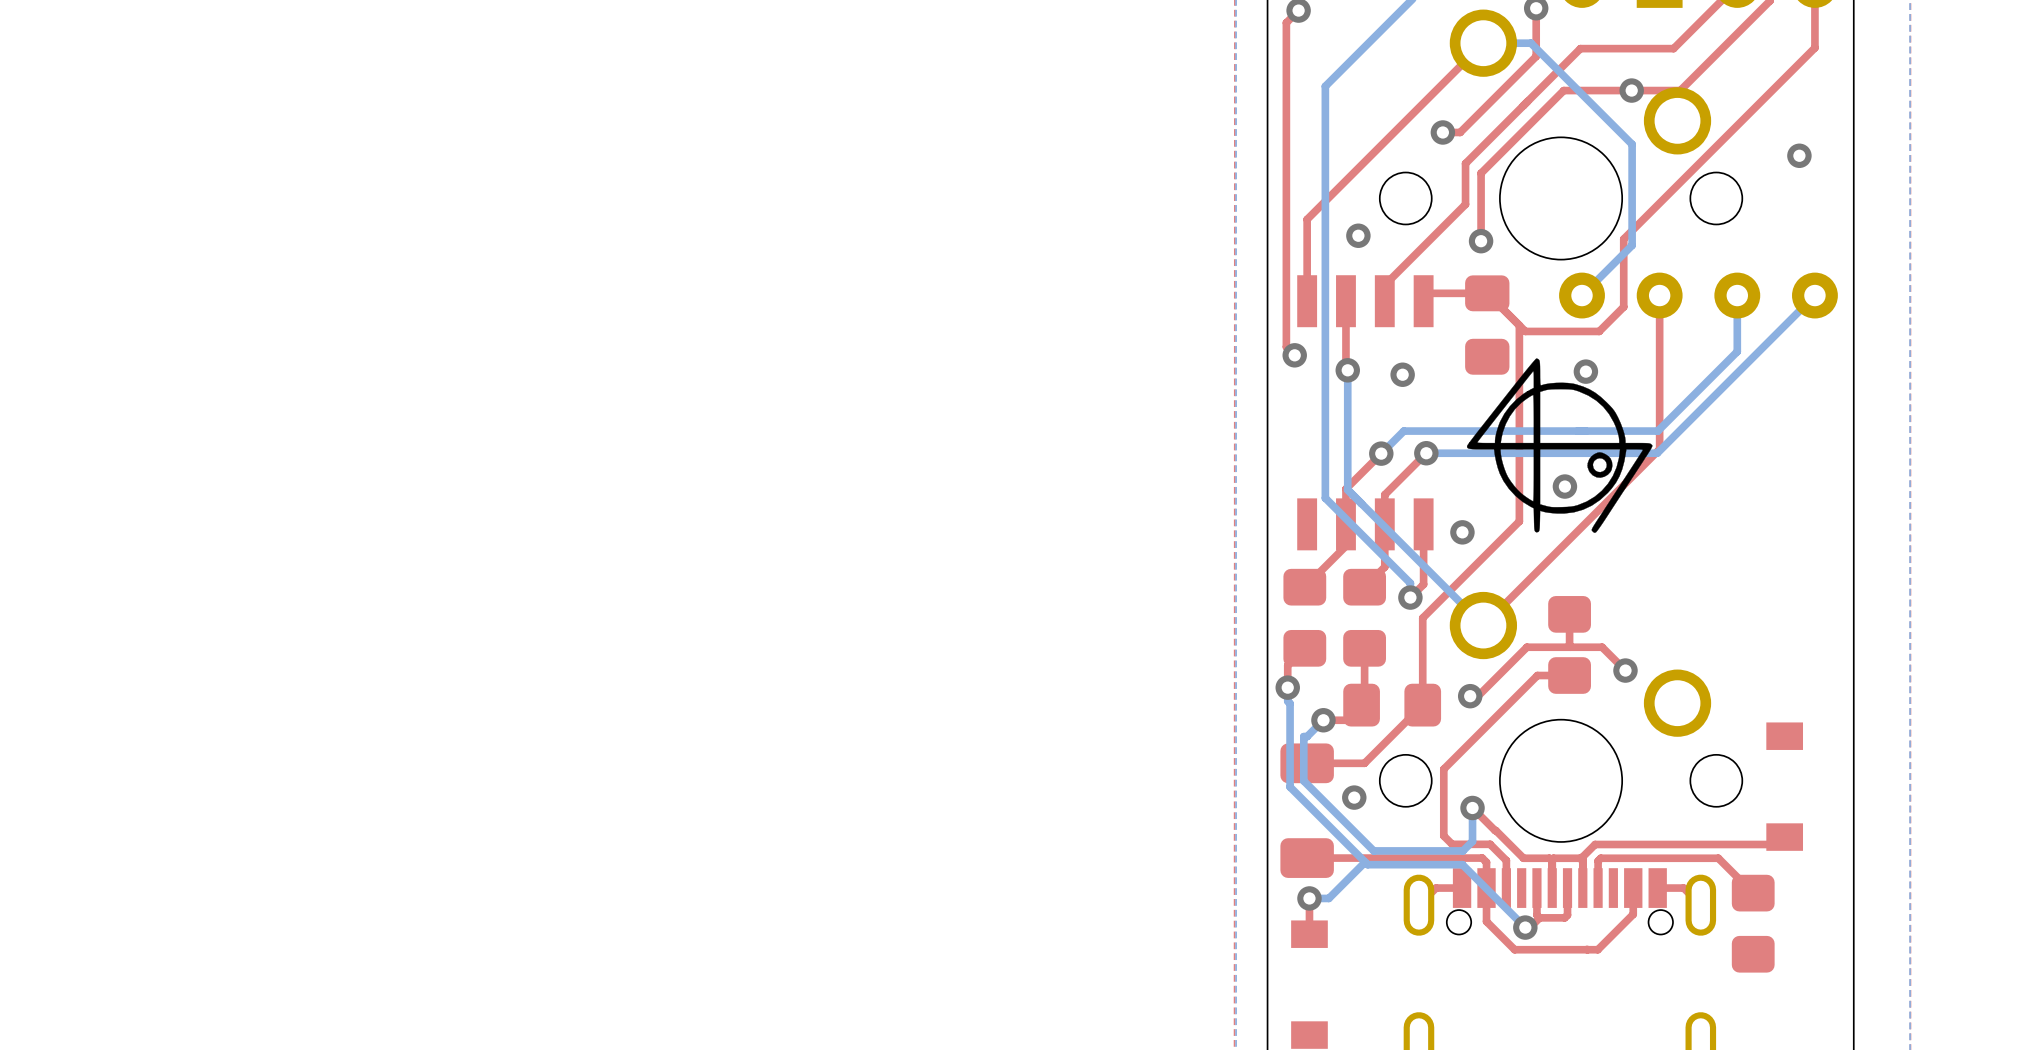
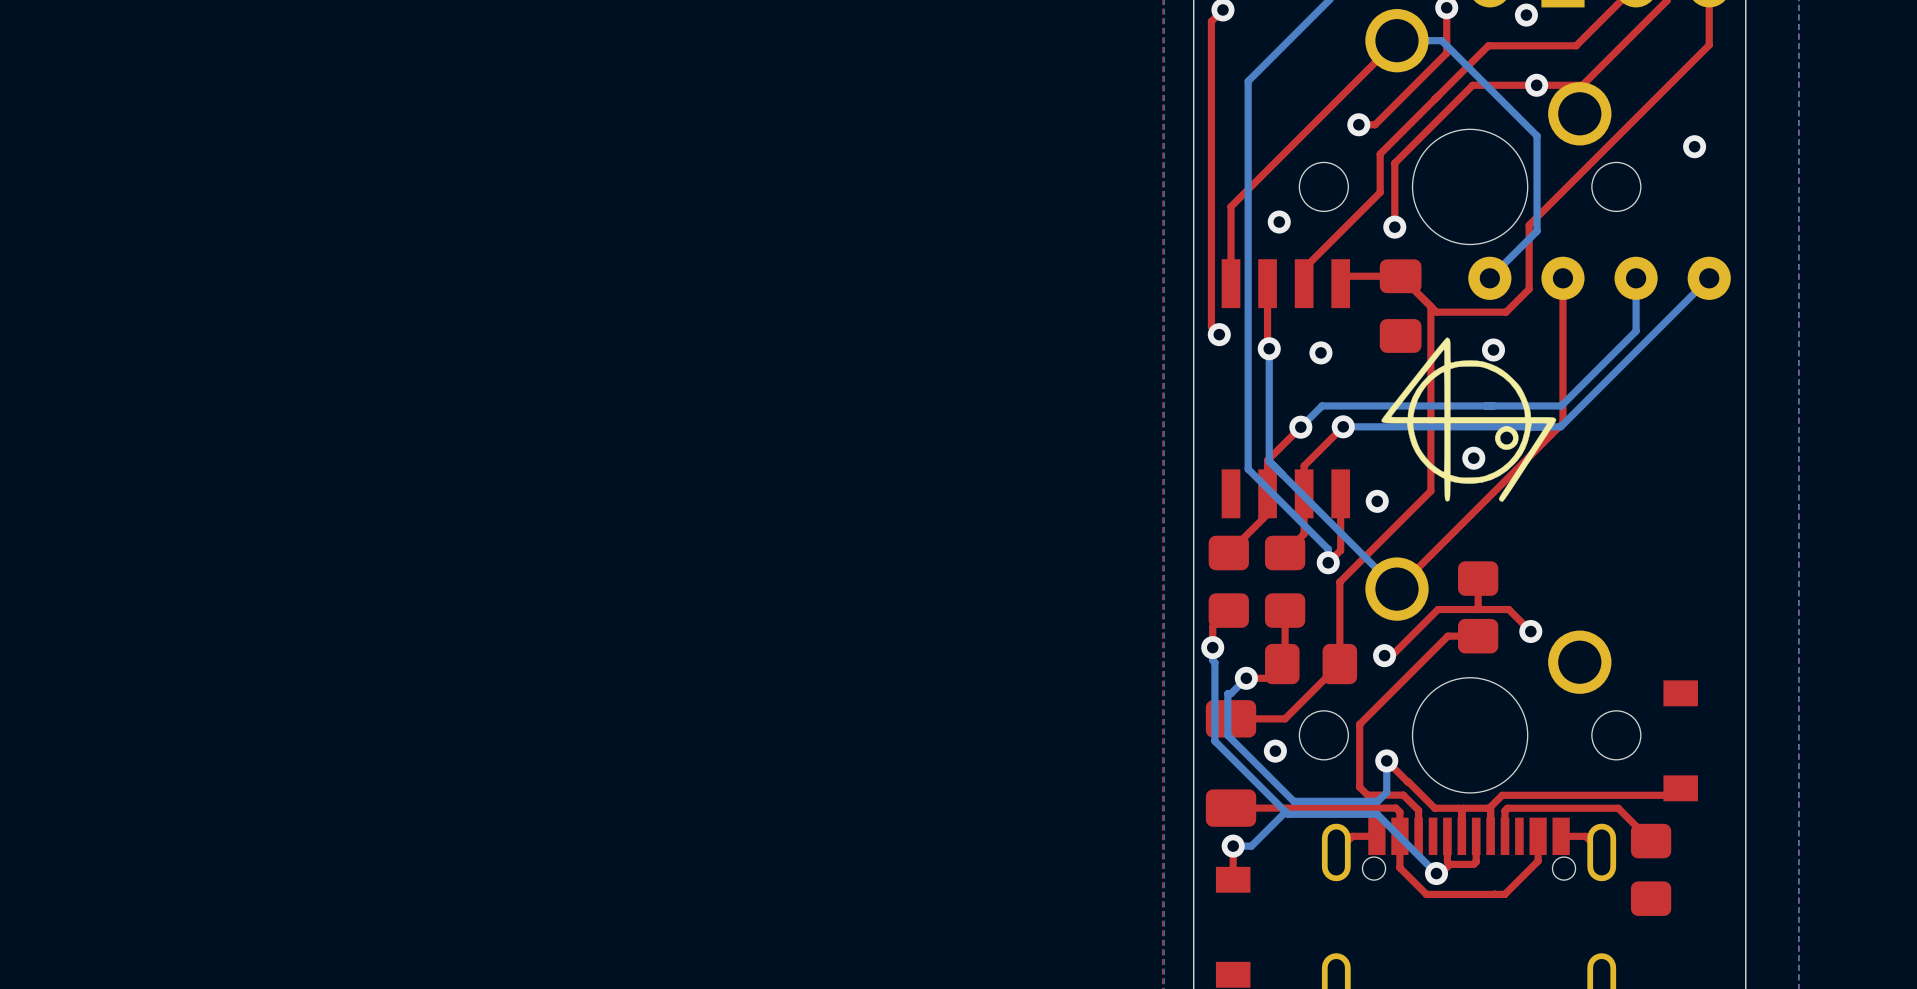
via: none -> (1526, 15)

